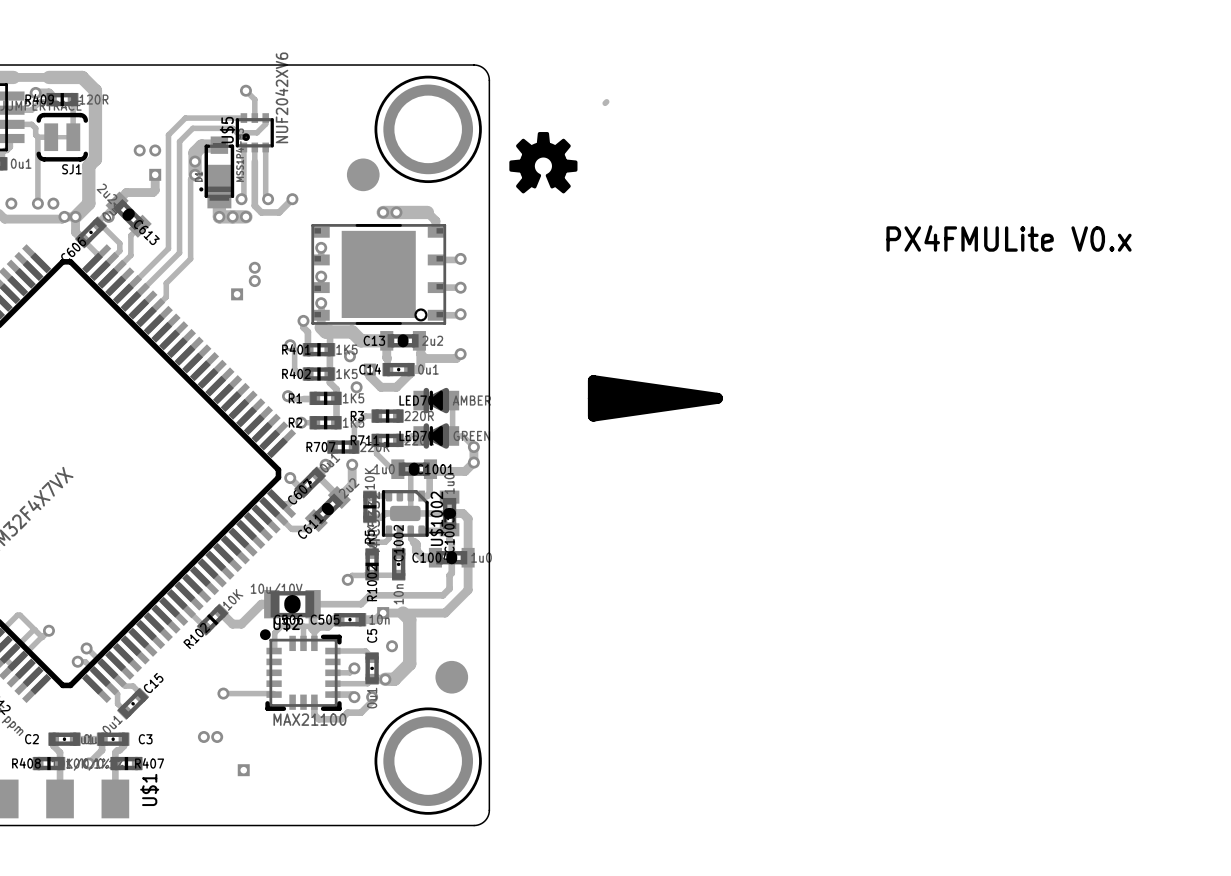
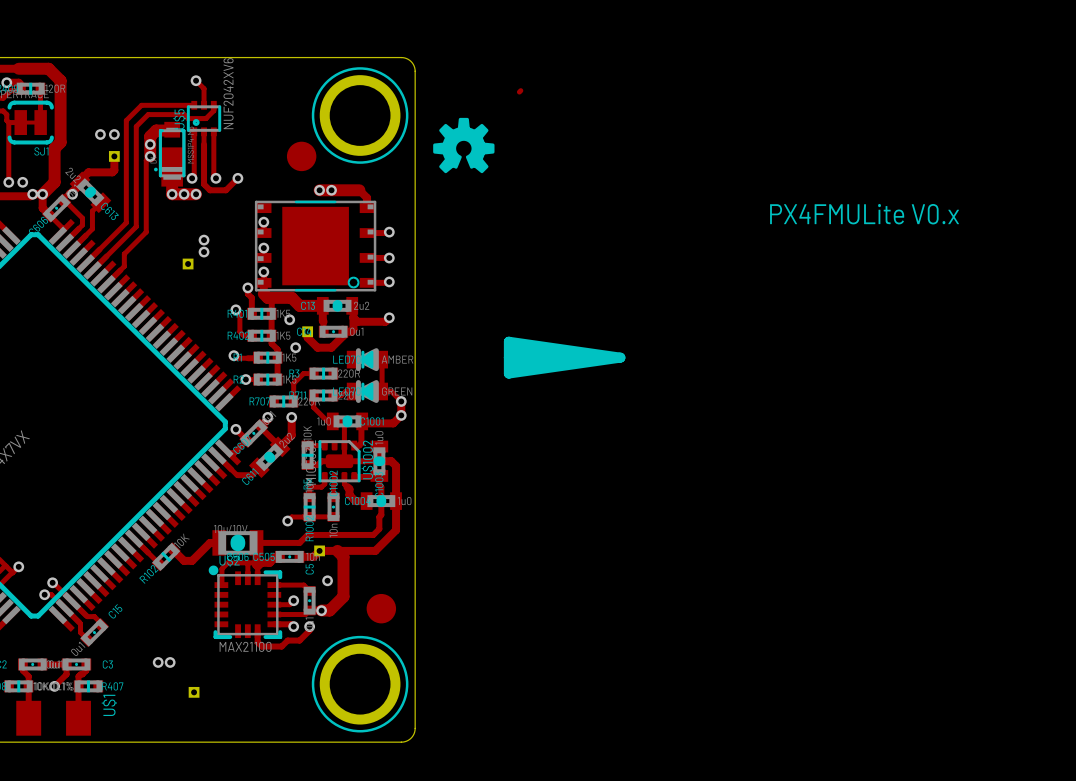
track: (223, 693) (274, 694) -> none
via: (223, 693) -> none

